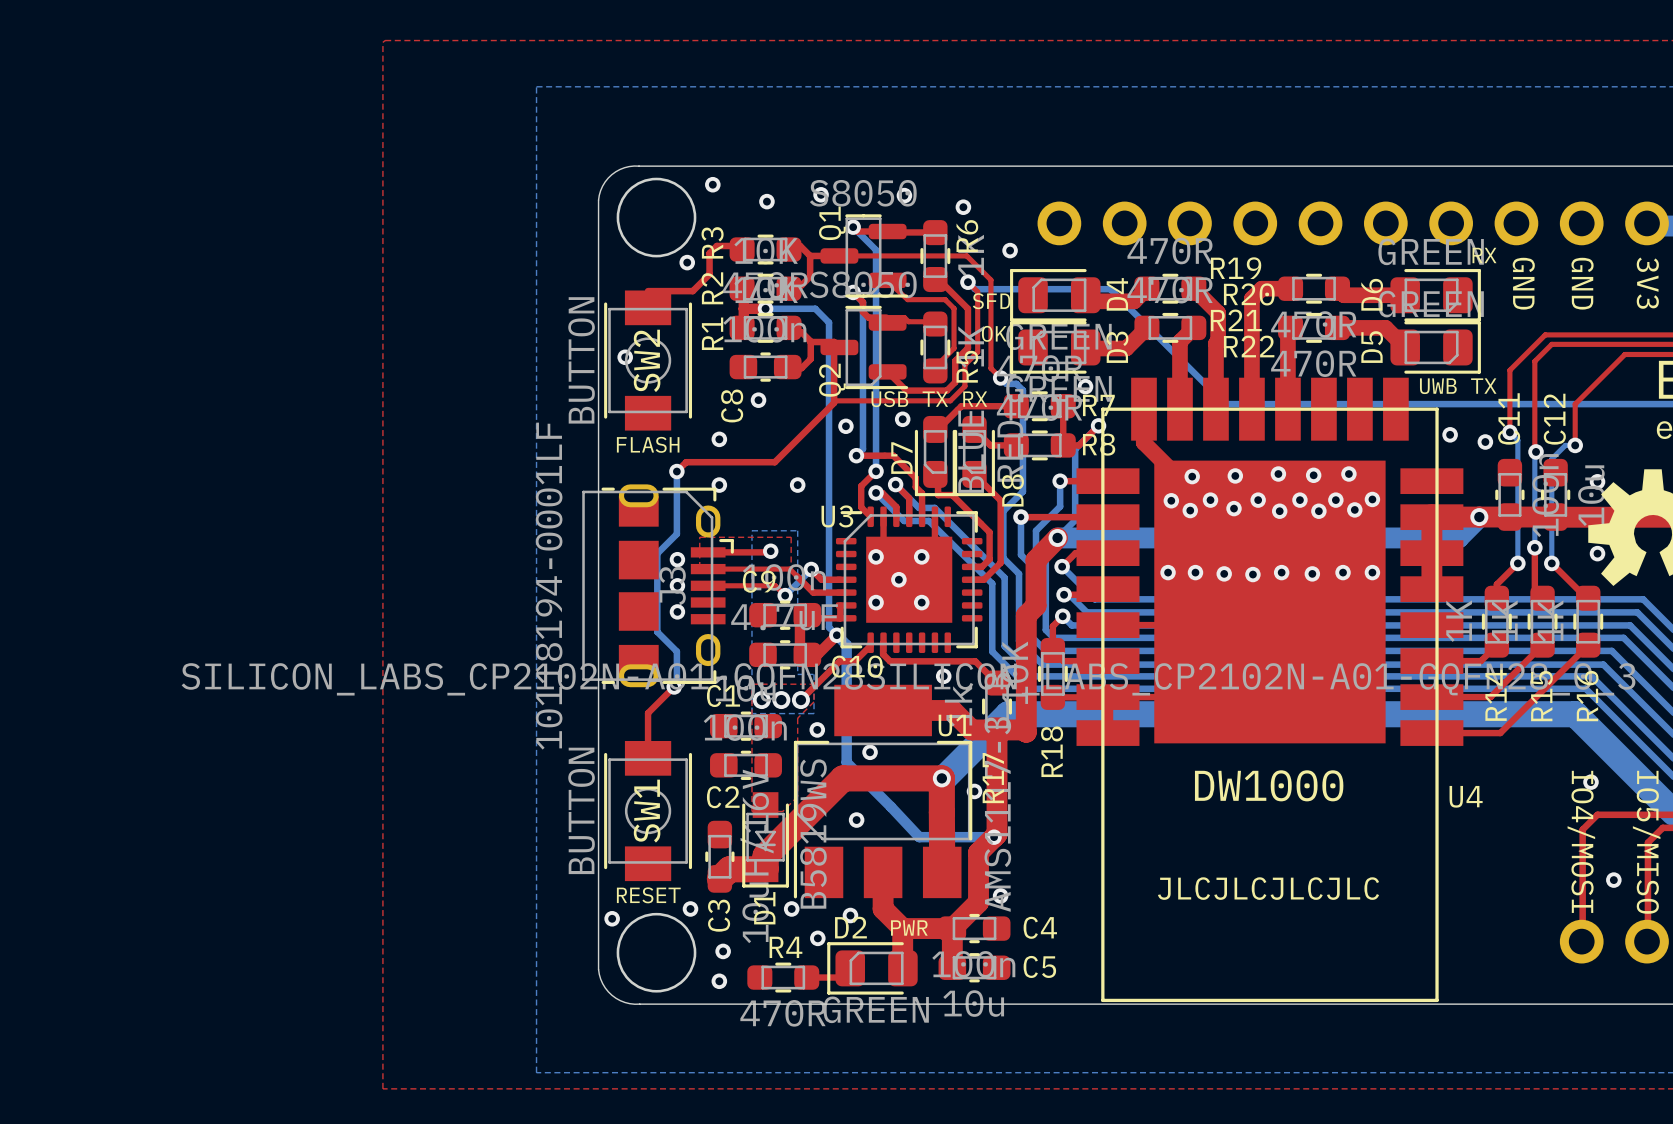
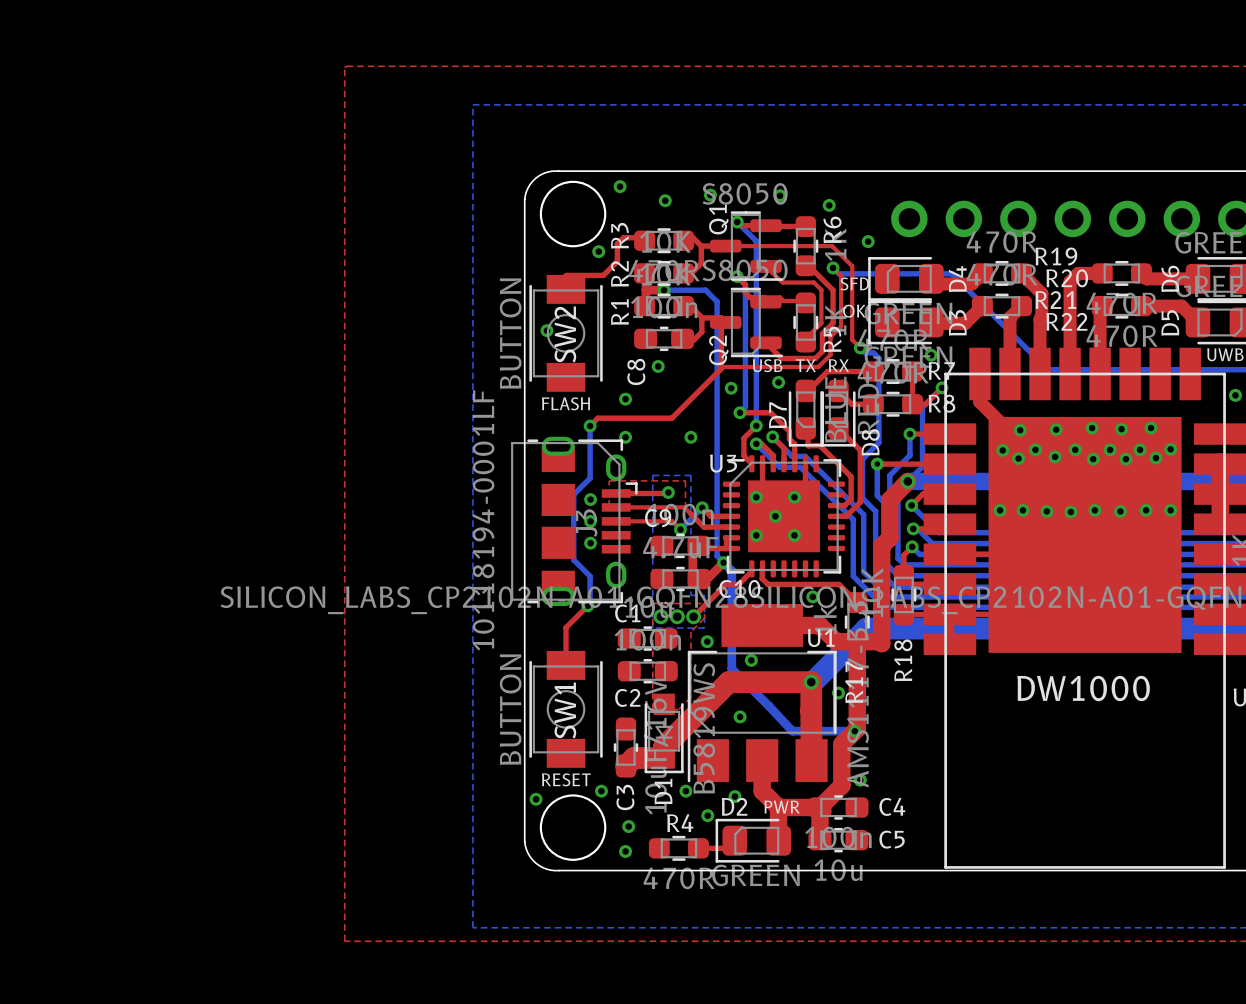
text: JLCJLCJLCJLC (1268, 888) -> none

